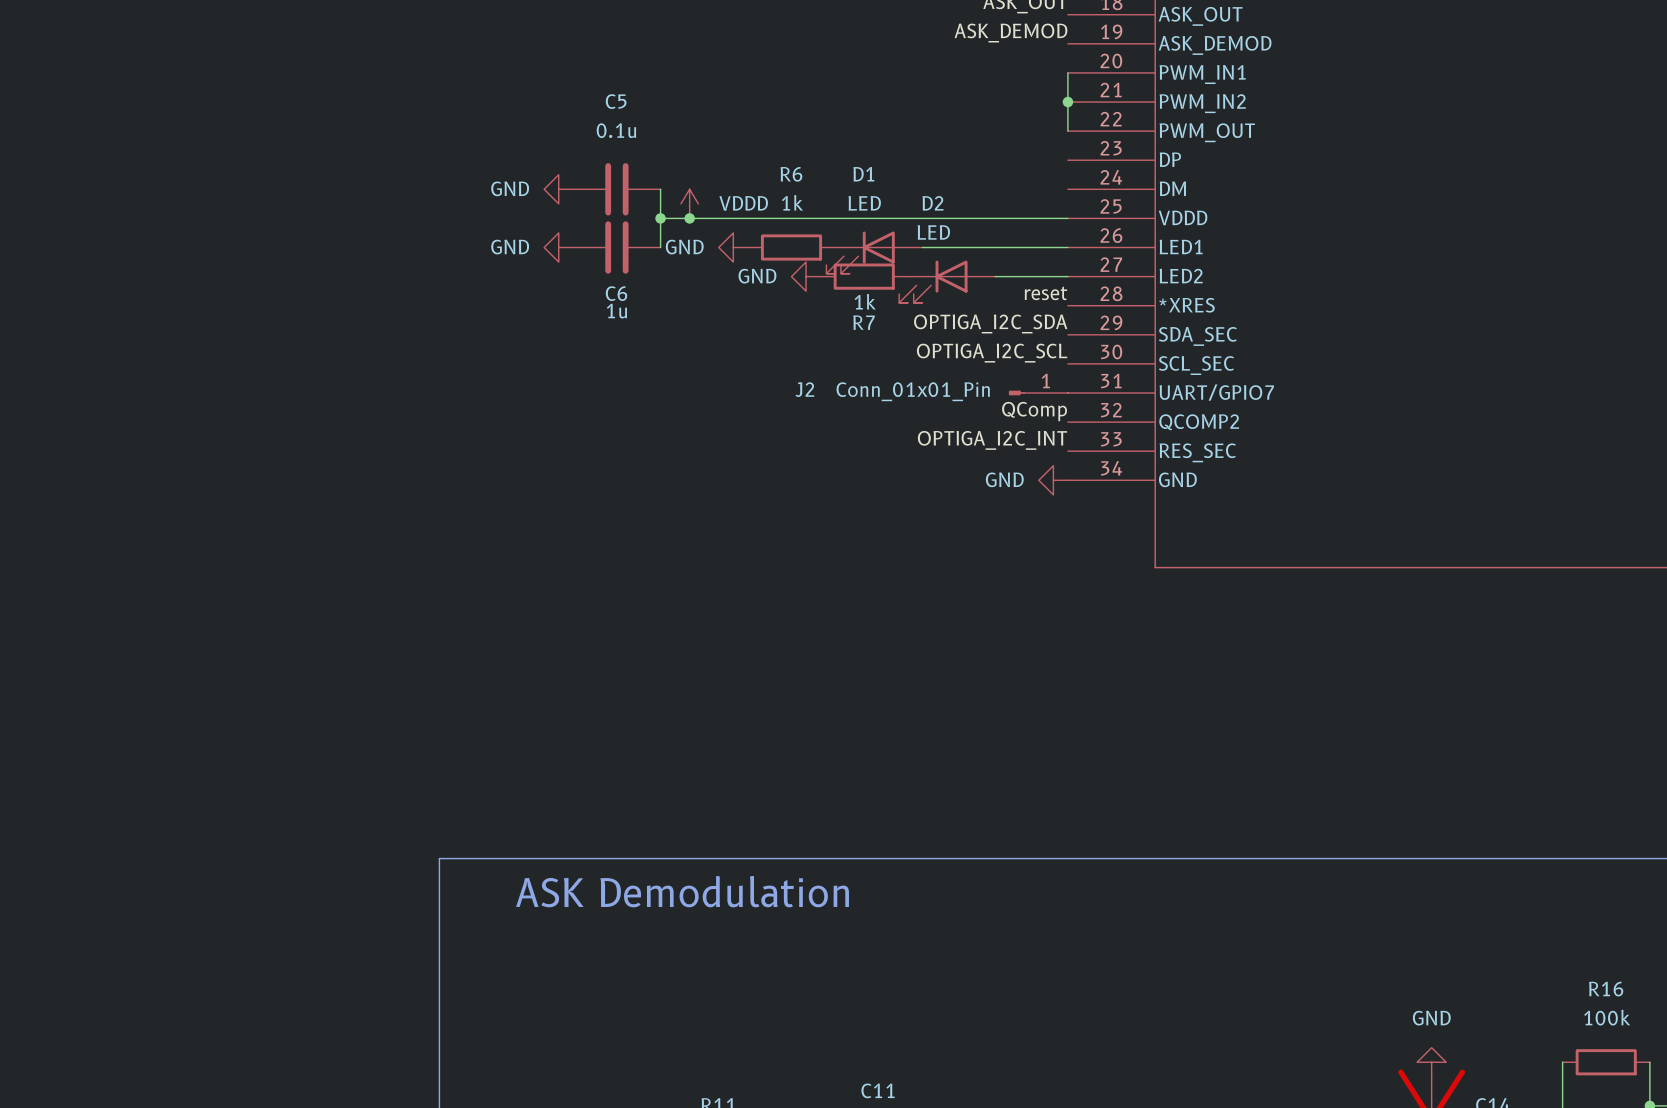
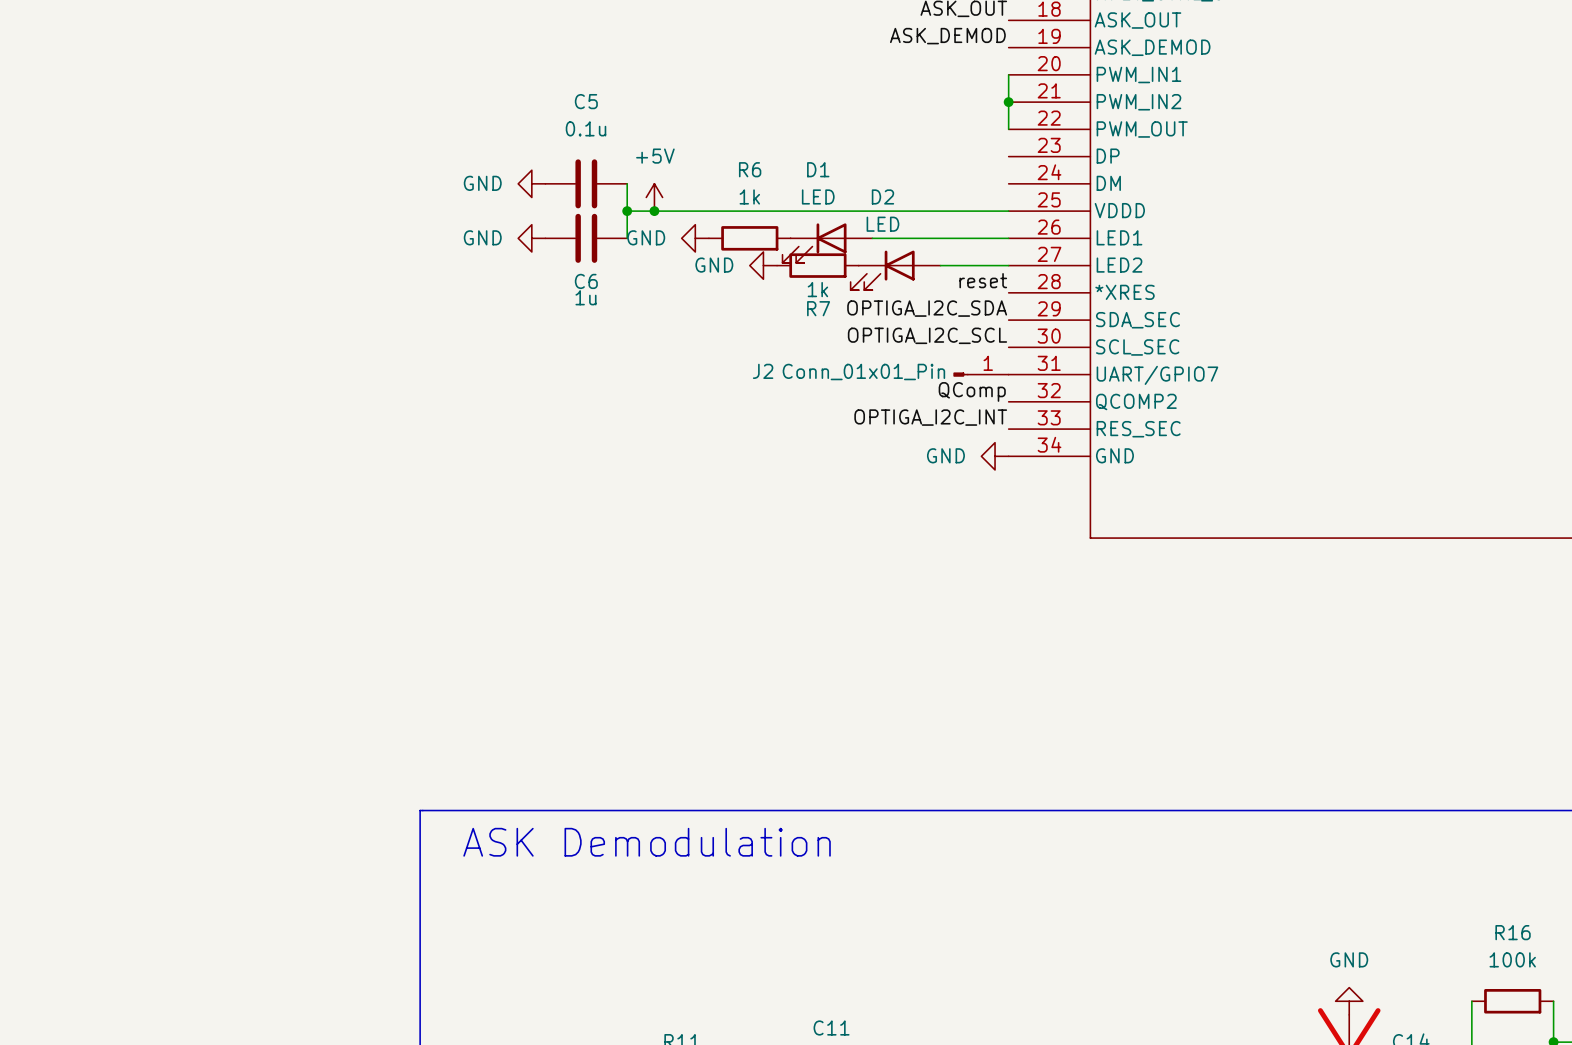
power symbol: VDDD (689, 203) -> +5V (654, 197)

